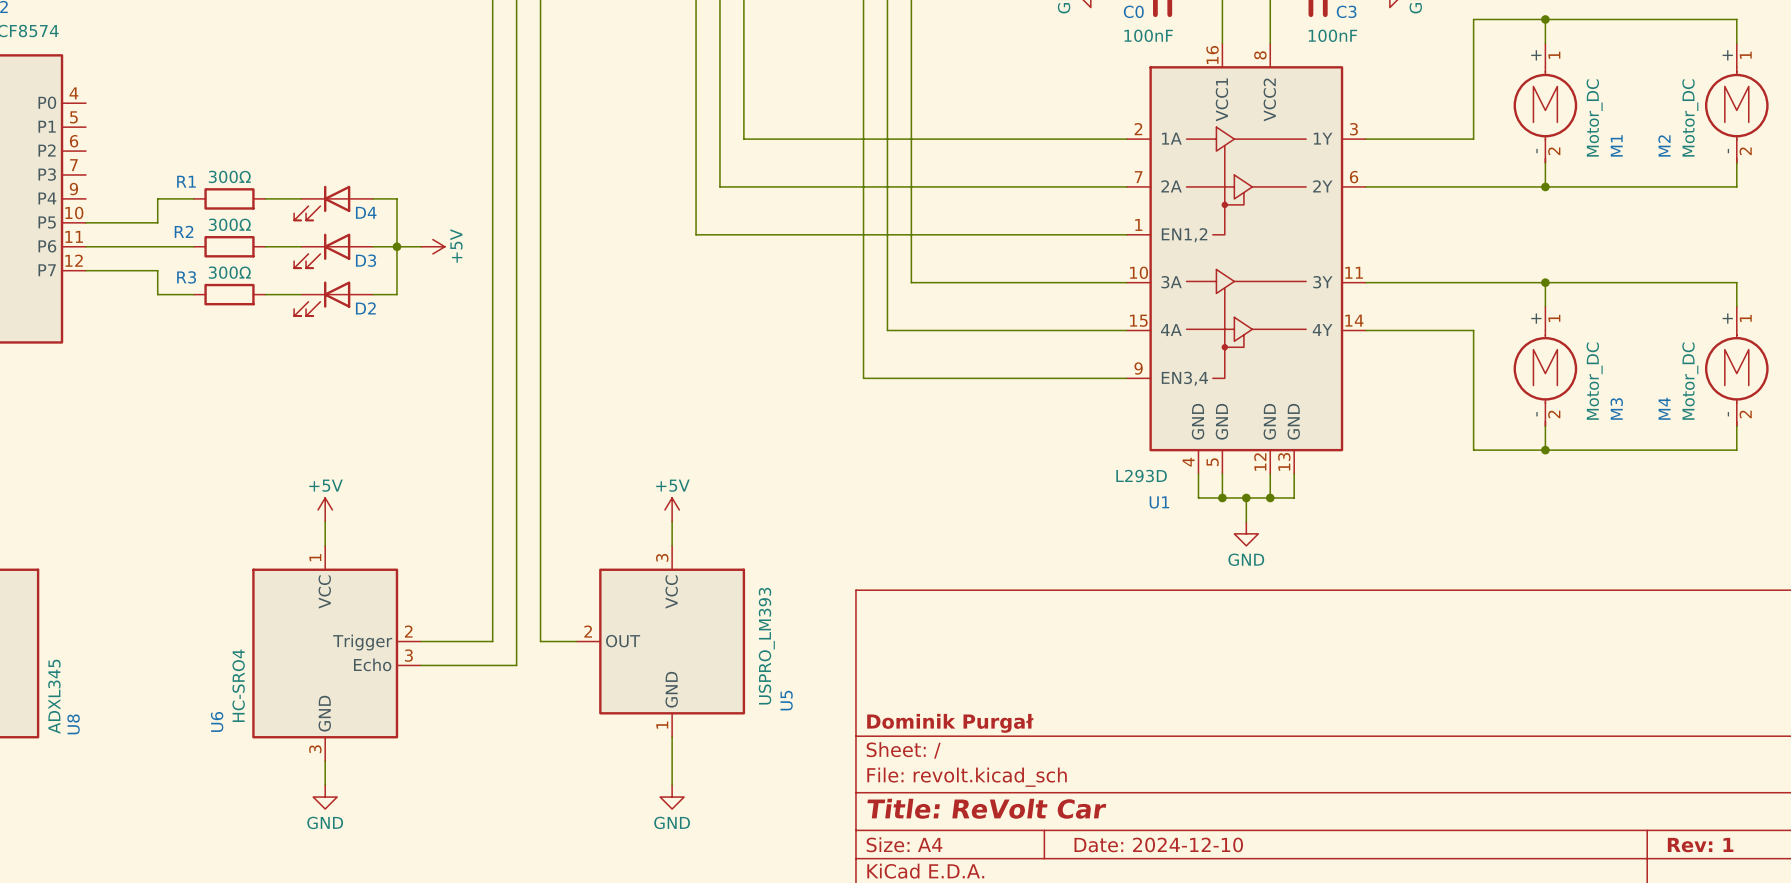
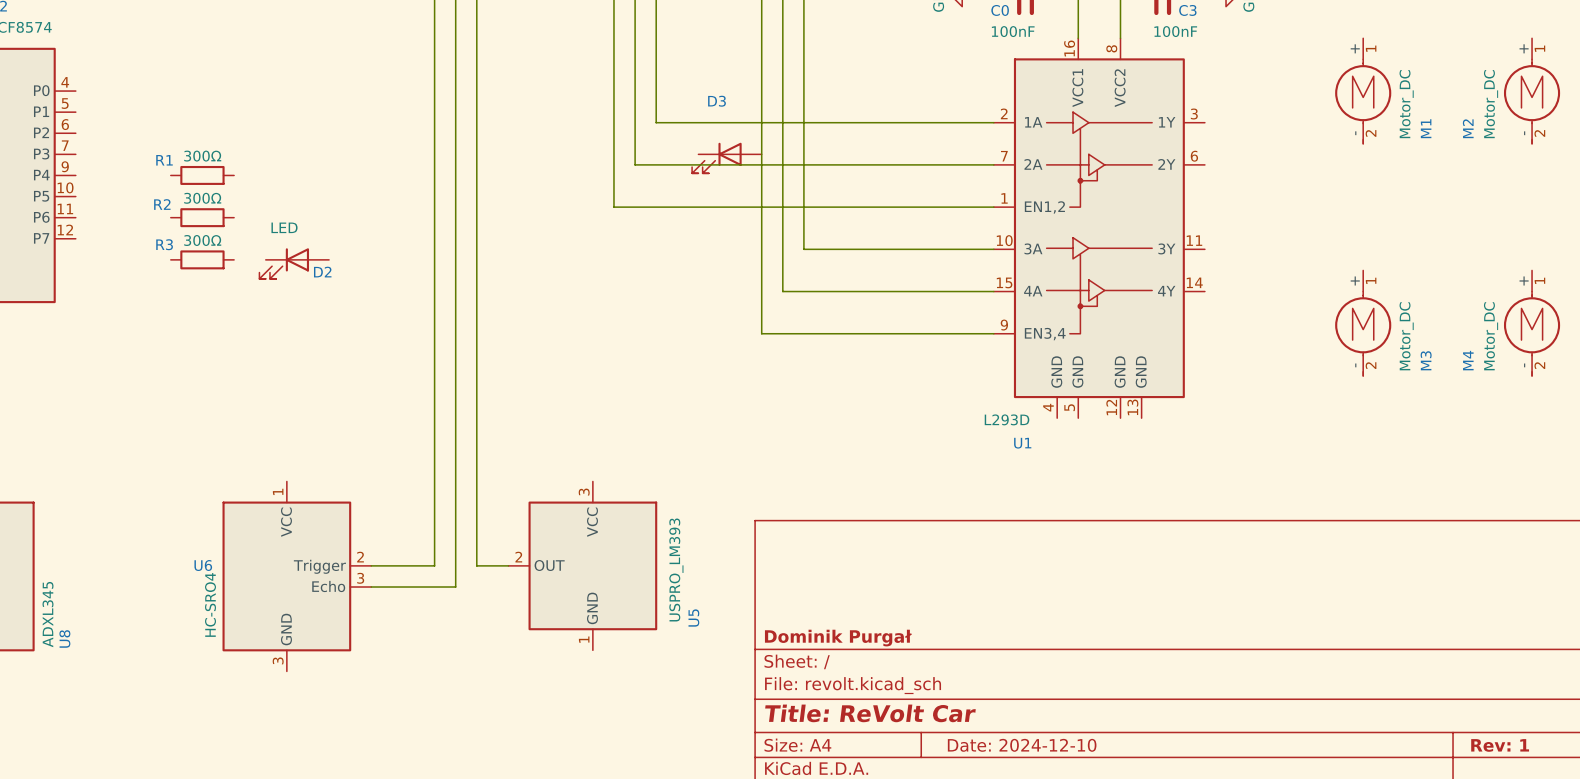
wire: (1545, 19) (1545, 43) -> none
junction: (1545, 19) -> none
wire: (1736, 43) (1736, 19) (1473, 19) (1473, 139) (1365, 139) -> none
wire: (1545, 163) (1545, 186) -> none
wire: (1736, 163) (1736, 186) (1365, 186) -> none
junction: (1545, 186) -> none
wire: (193, 198) (157, 198) (157, 222) (85, 222) -> none
wire: (265, 198) (301, 198) -> none
wire: (373, 198) (396, 198) (396, 294) (373, 294) -> none
D4: (333, 203) -> none
wire: (85, 246) (193, 246) -> none
wire: (265, 246) (301, 246) -> none
wire: (373, 246) (420, 246) -> none
junction: (396, 246) -> none
power symbol: +5V (432, 246) -> none
D3 position: (333, 250) -> (726, 158)
D2 value: none -> LED (284, 227)
D3 name position: D3 (366, 260) -> D3 (717, 101)
wire: (85, 270) (157, 270) (157, 294) (193, 294) -> none
wire: (1365, 282) (1736, 282) (1736, 306) -> none
wire: (1545, 282) (1545, 306) -> none
junction: (1545, 282) -> none
wire: (265, 294) (301, 294) -> none
wire: (1365, 330) (1473, 330) (1473, 450) (1736, 450) (1736, 426) -> none
wire: (1545, 426) (1545, 450) -> none
junction: (1545, 450) -> none
wire: (1198, 474) (1198, 497) (1294, 497) (1294, 474) -> none
wire: (1222, 474) (1222, 497) -> none
wire: (1270, 474) (1270, 497) -> none
junction: (1222, 497) -> none
wire: (1246, 497) (1246, 521) -> none
junction: (1246, 497) -> none
junction: (1270, 497) -> none
power symbol: +5V (325, 509) -> none
power symbol: +5V (672, 509) -> none
wire: (325, 521) (325, 545) -> none
wire: (672, 521) (672, 545) -> none
power symbol: GND (1246, 533) -> none
U6 name rotation: 0° (217, 721) -> 90° clockwise (203, 565)
U6 name position: U6 (217, 721) -> U6 (203, 565)
wire: (672, 737) (672, 785) -> none
wire: (325, 761) (325, 785) -> none
power symbol: GND (325, 797) -> none
power symbol: GND (672, 797) -> none

